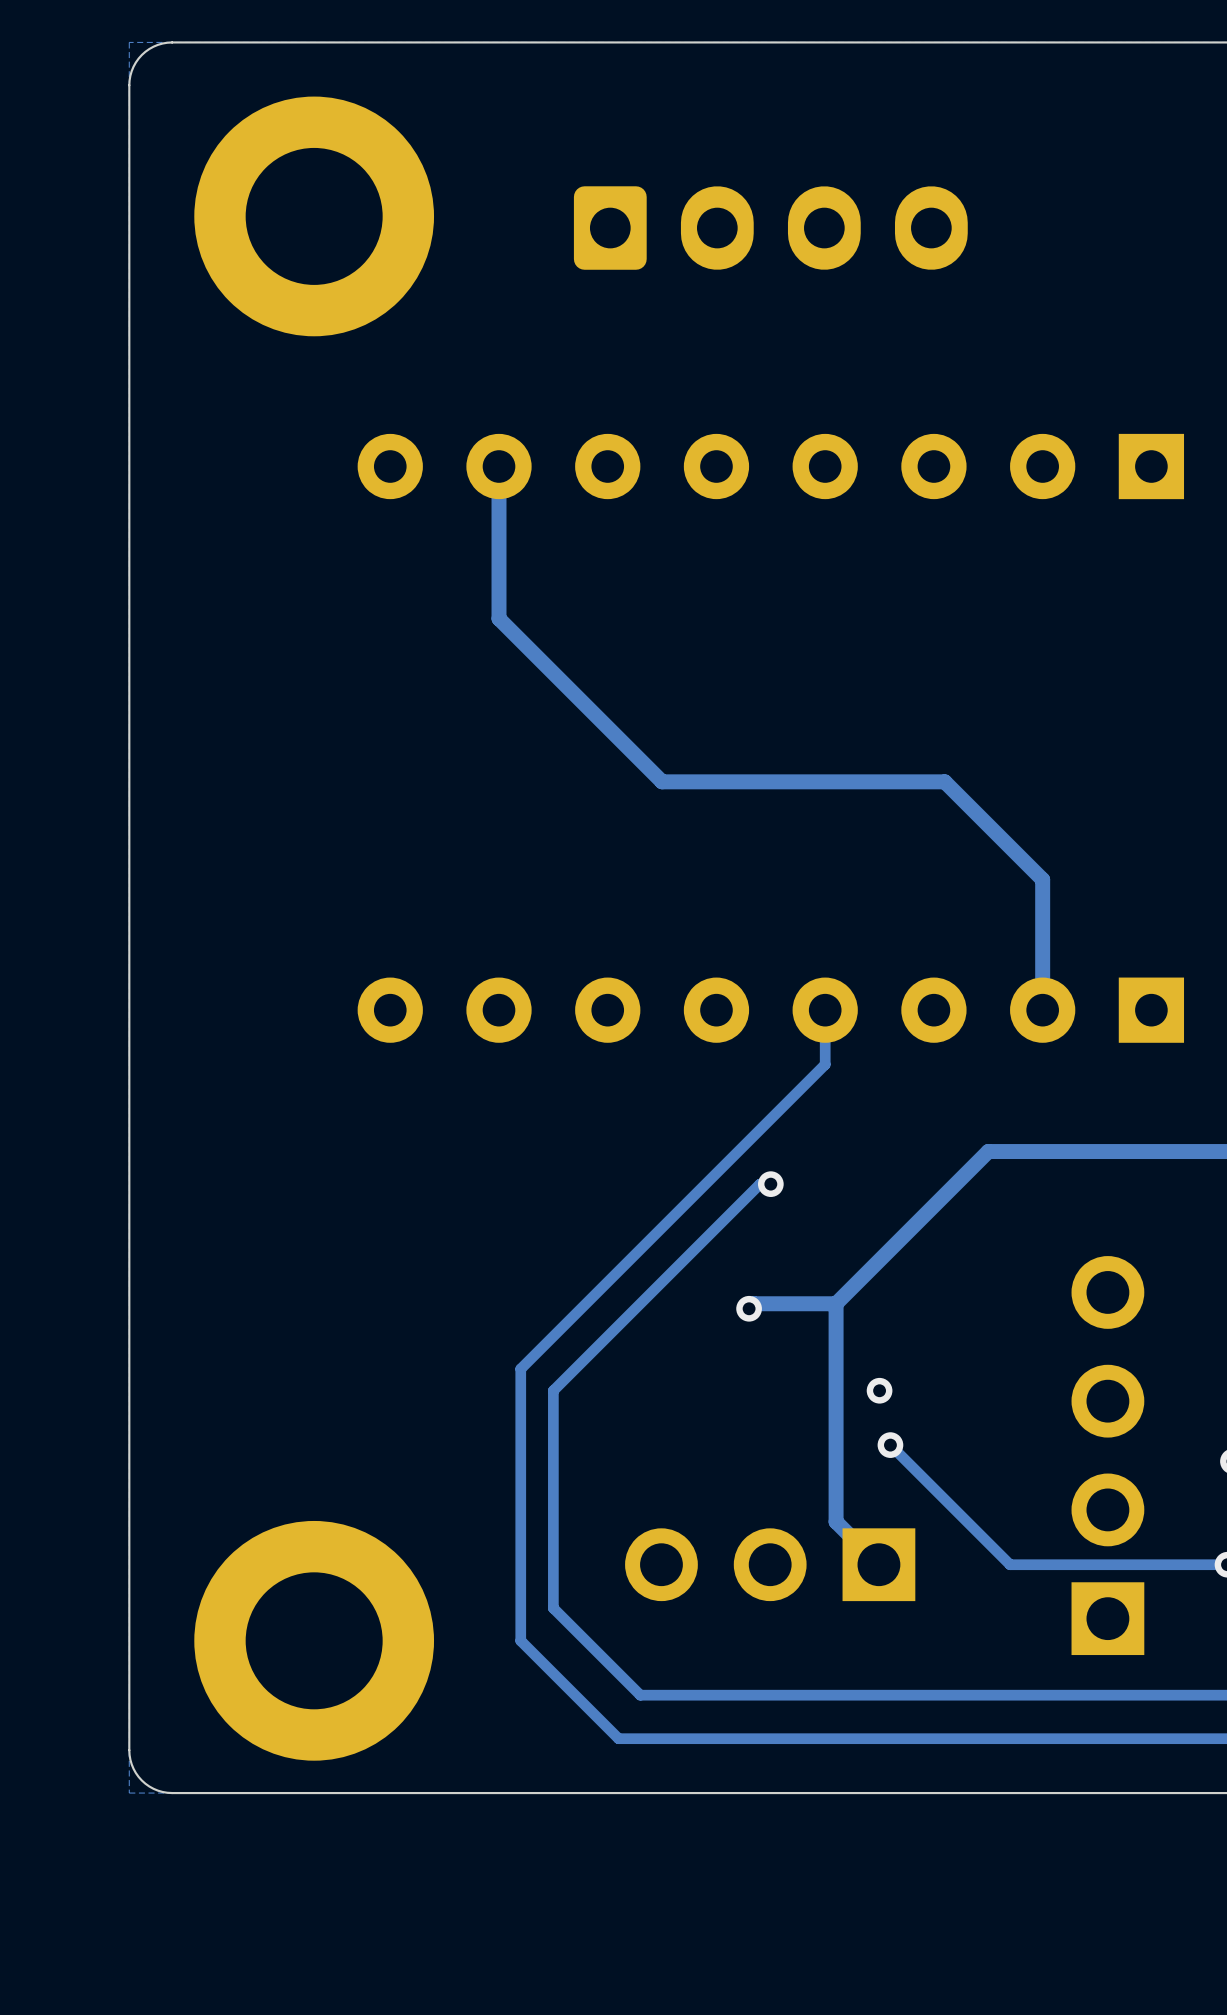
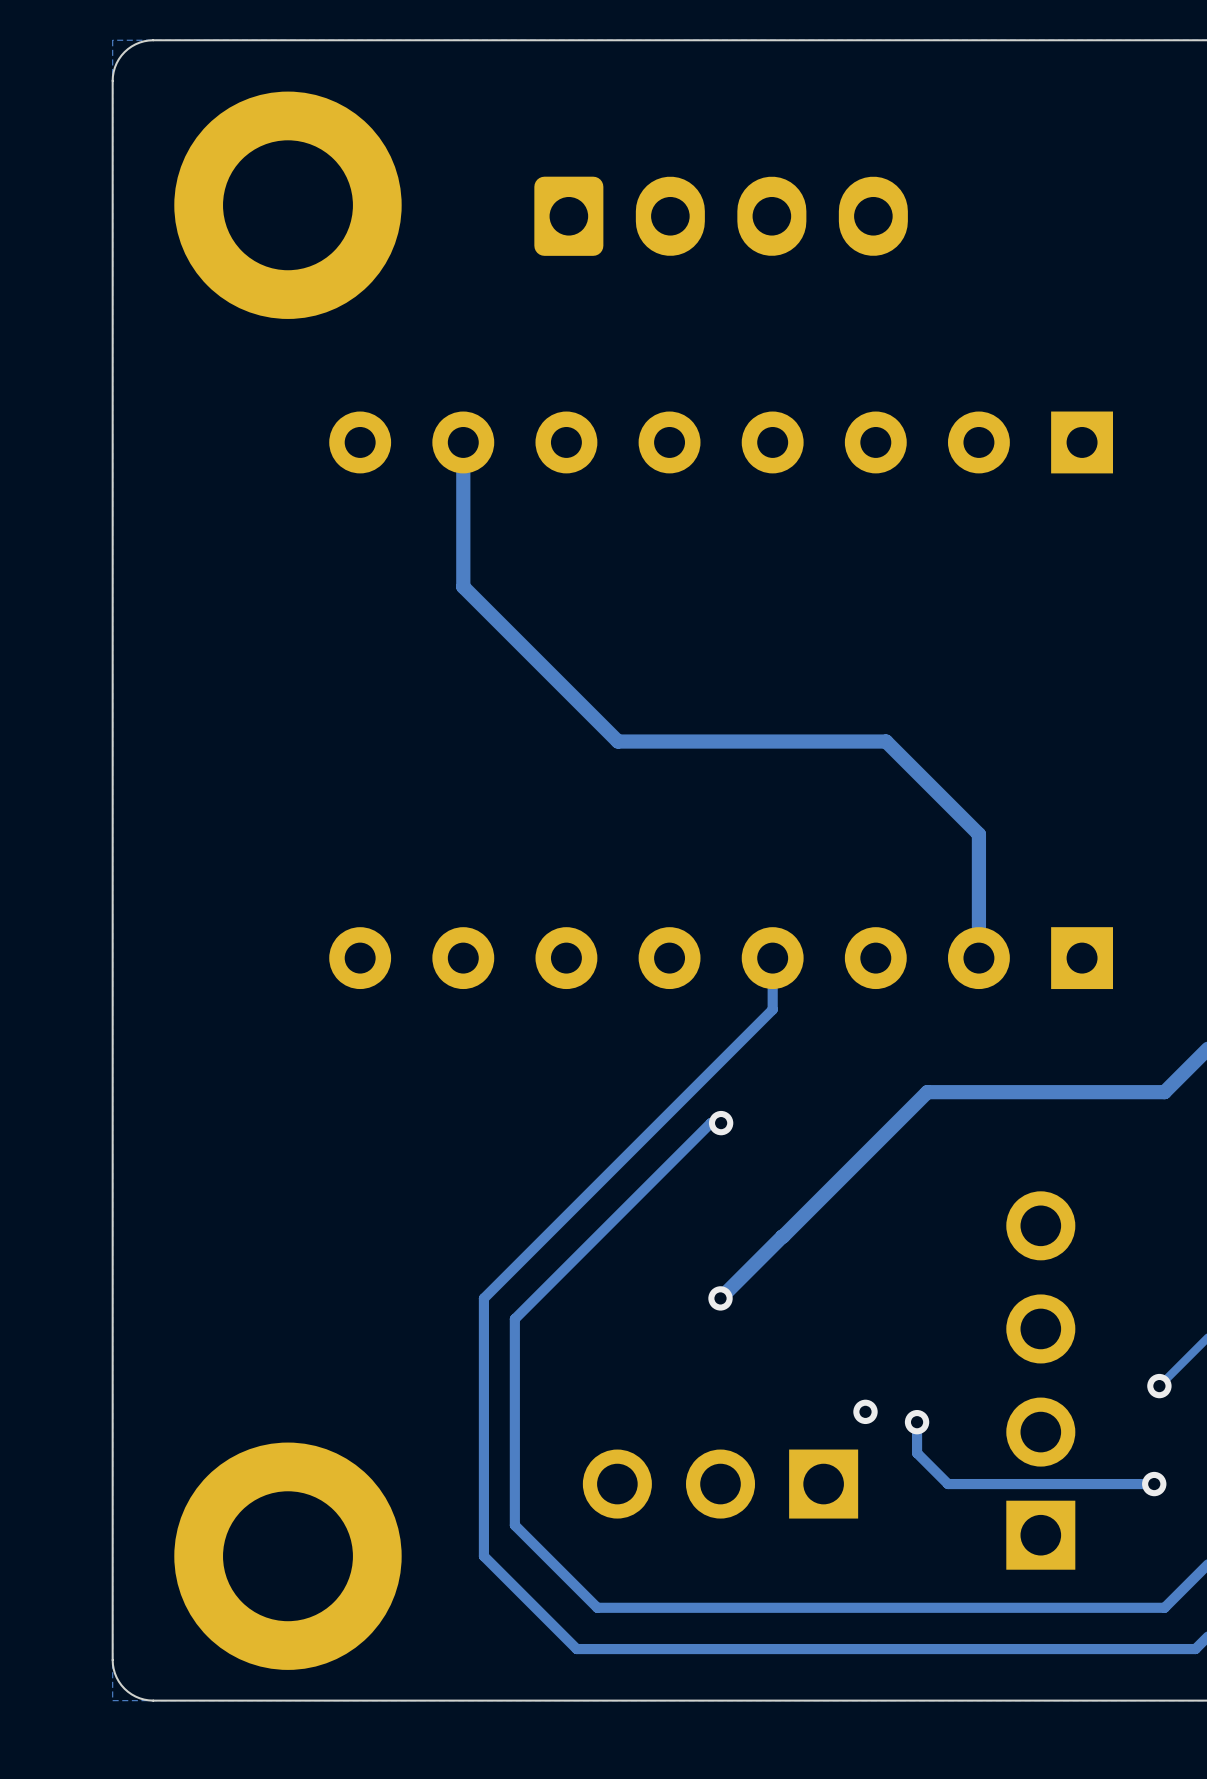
track: (835, 1303) (754, 1303) (749, 1308) -> (782, 1236) (720, 1298)
track: (836, 1303) (836, 1521) (878, 1564) -> none
via: (749, 1308) -> none
via: none -> (720, 1298)
via: (879, 1390) -> none
track: (890, 1445) (977, 1532) -> (917, 1422) (917, 1453)
via: (890, 1445) -> none
via: none -> (865, 1411)
via: none -> (917, 1422)

